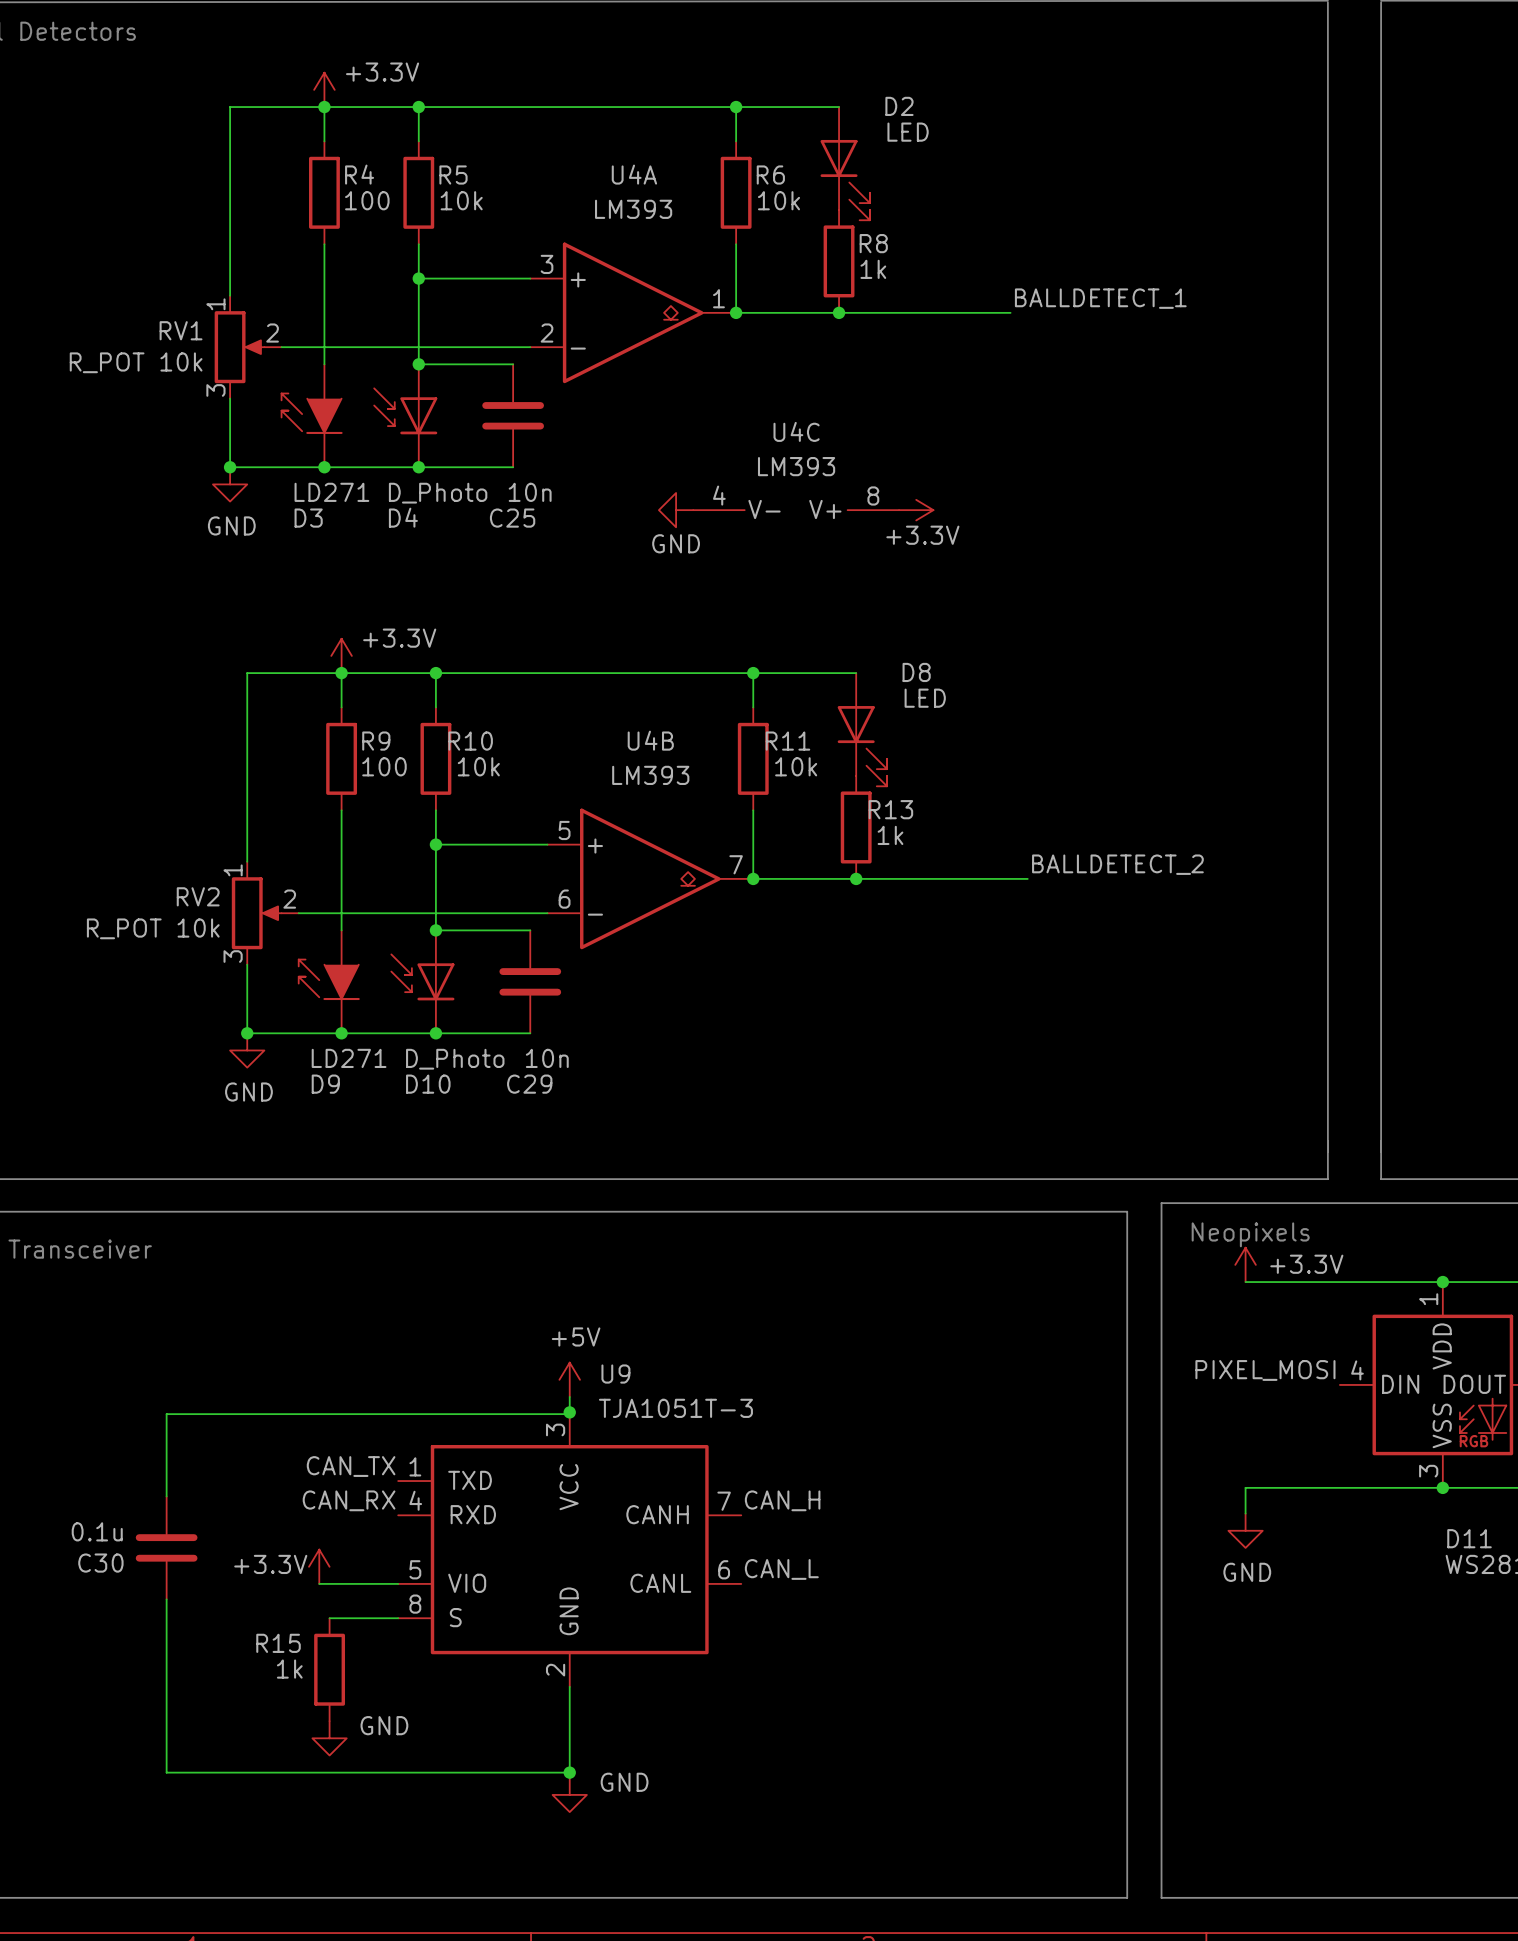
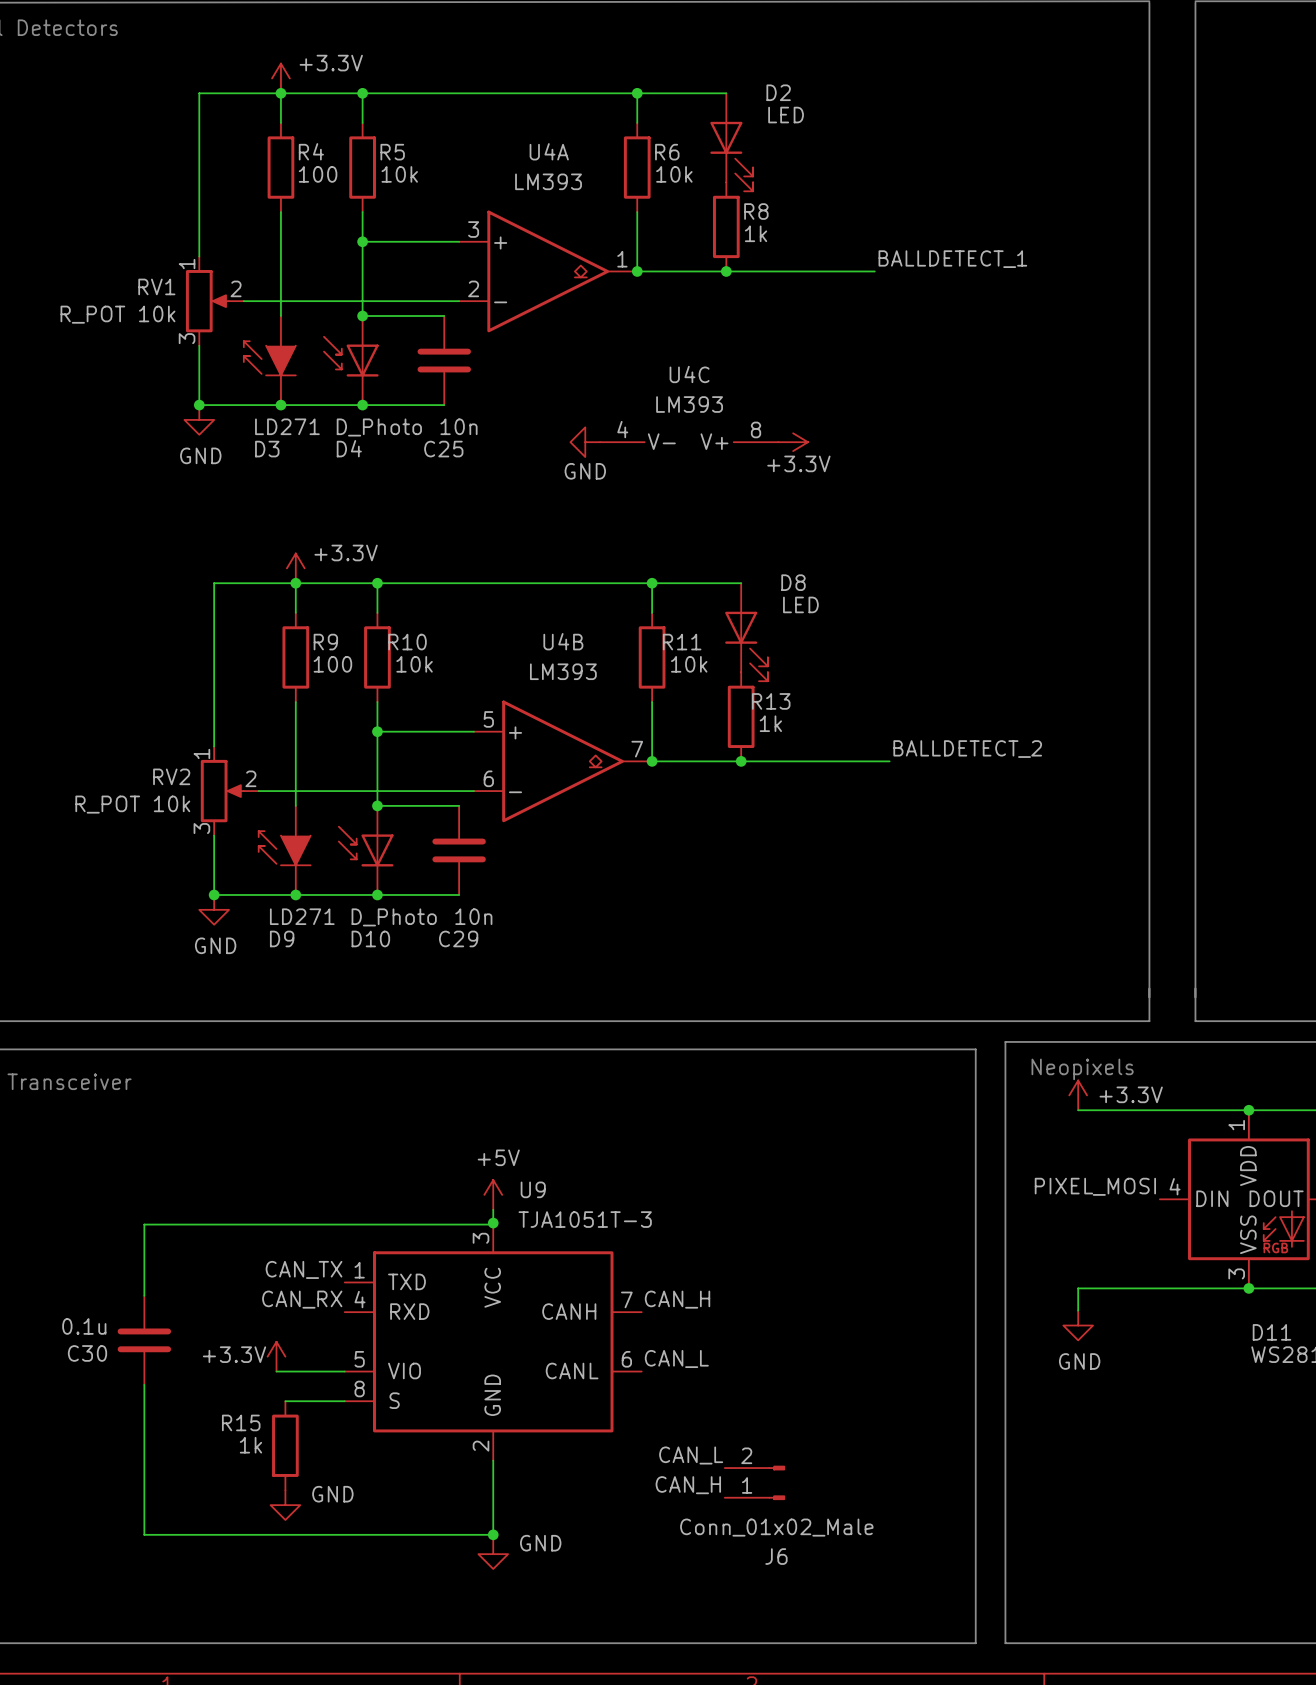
label: none -> CAN_L (691, 1455)
J6: none -> Conn_01x02_Male (754, 1482)
label: none -> CAN_H (688, 1485)

